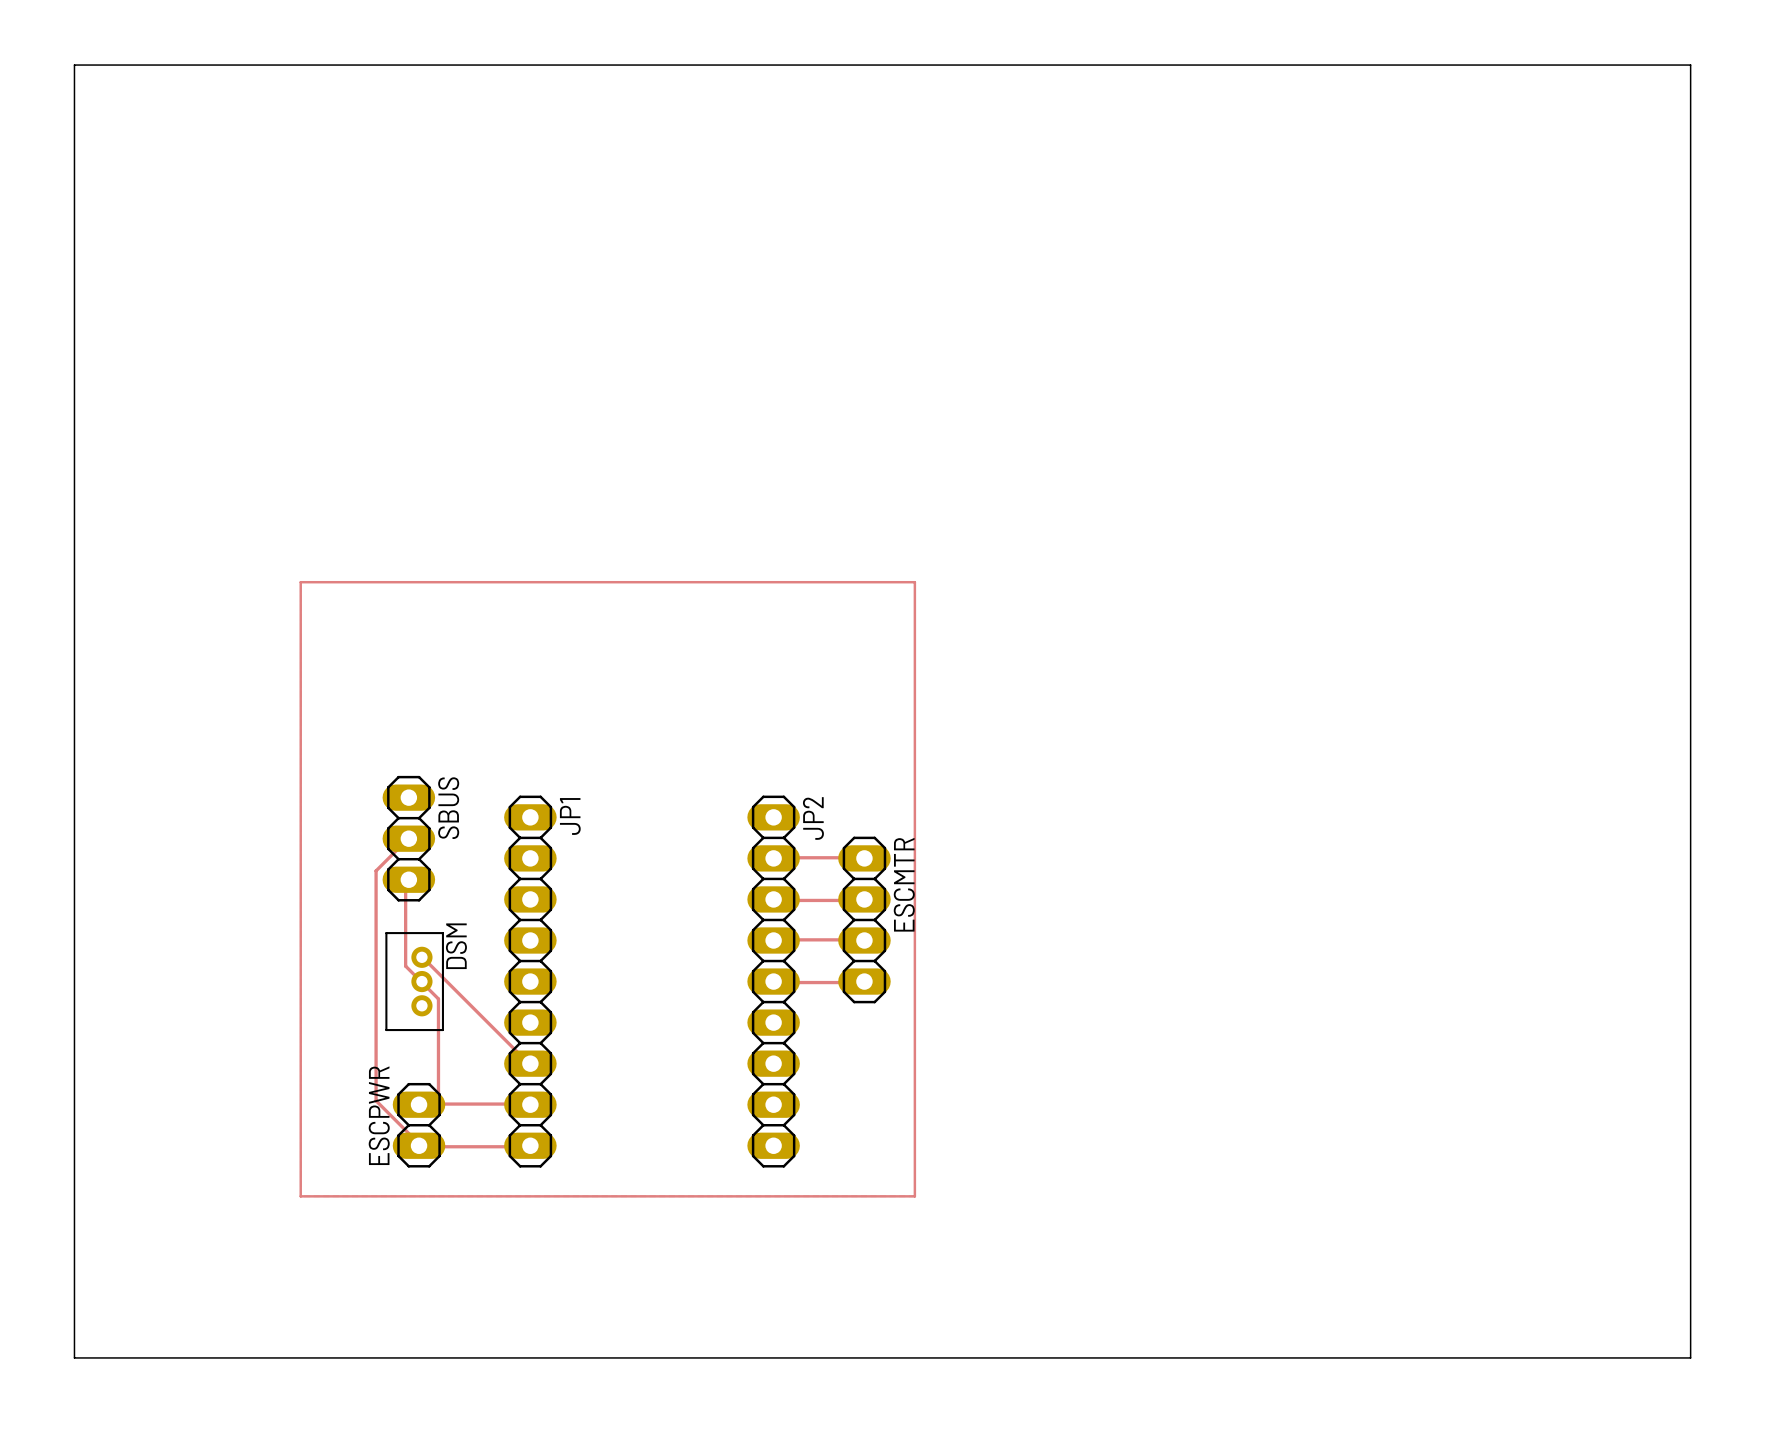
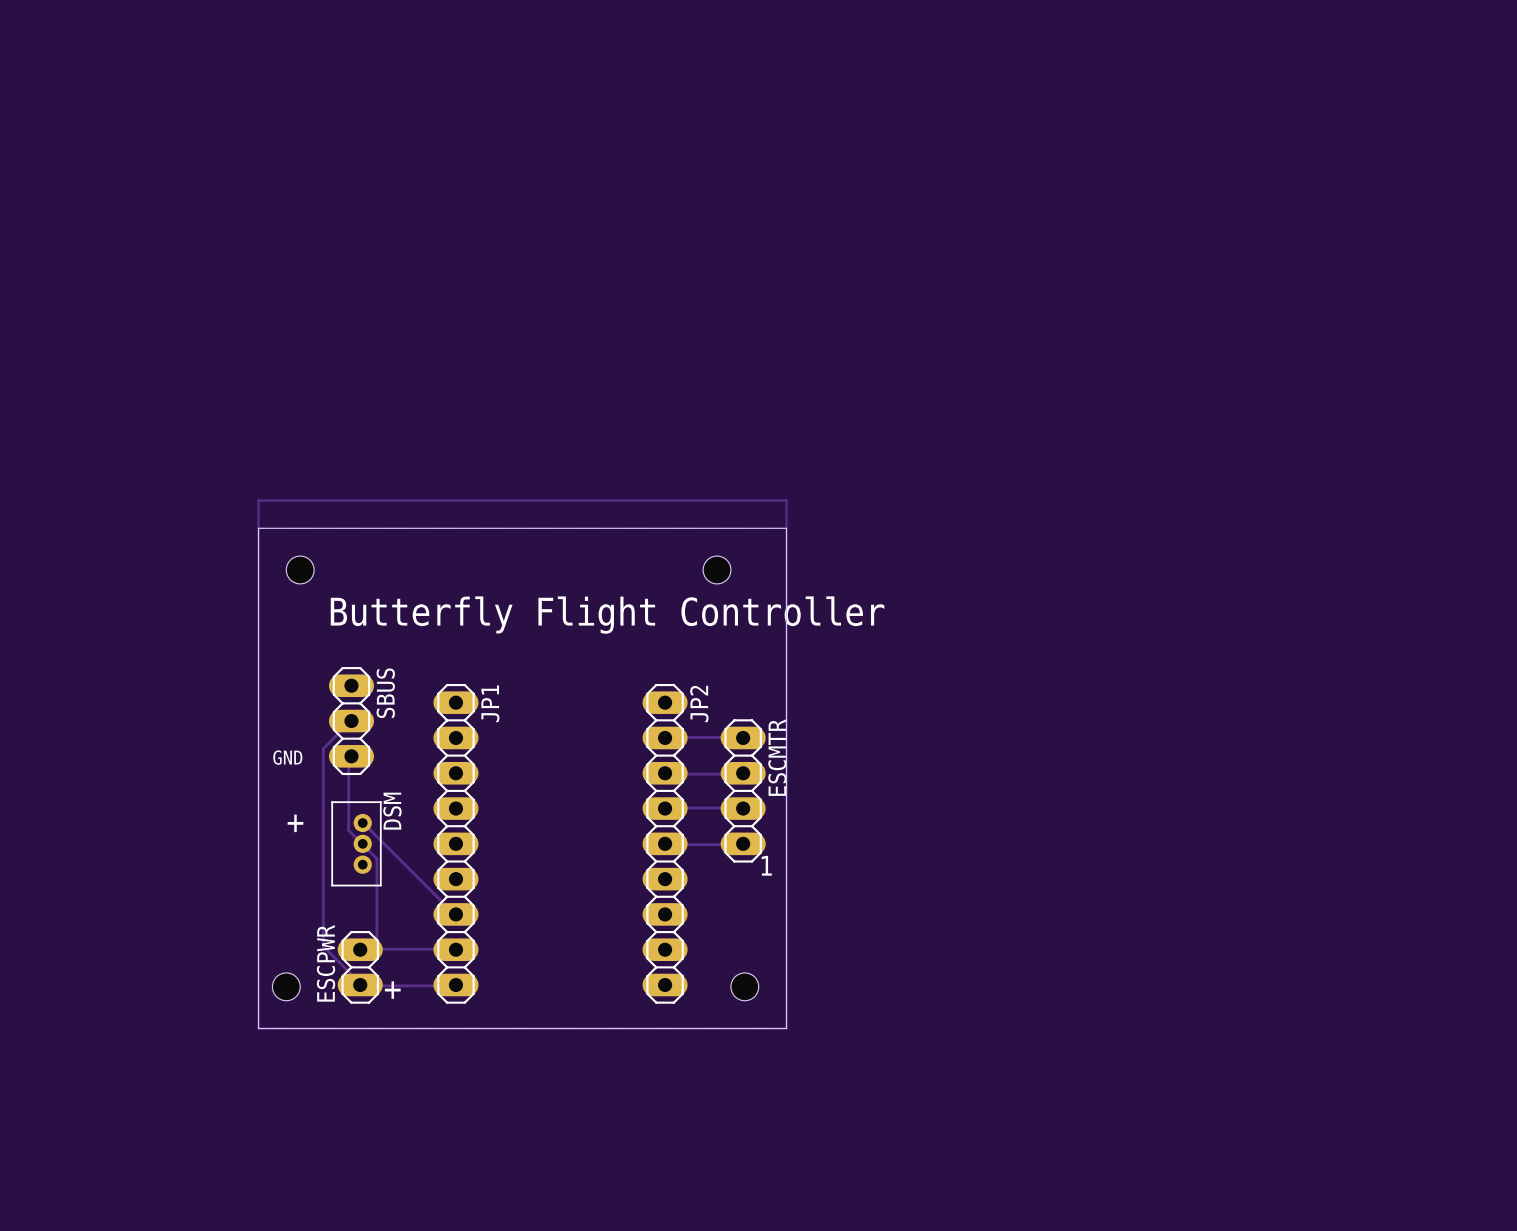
board edge: (74, 65) (1690, 65) (1690, 1357) (74, 1357) (74, 65) -> none
board edge: none -> (258, 528) (786, 528) (786, 1028) (258, 1028) (258, 528)
hole: none -> (300, 569)
hole: none -> (717, 569)
text: none -> Butterfly Flight Controller (607, 615)
text: none -> GND (287, 757)
text: none -> + (295, 823)
text: none -> 1 (766, 865)
hole: none -> (286, 986)
hole: none -> (744, 986)
text: none -> + (392, 990)

